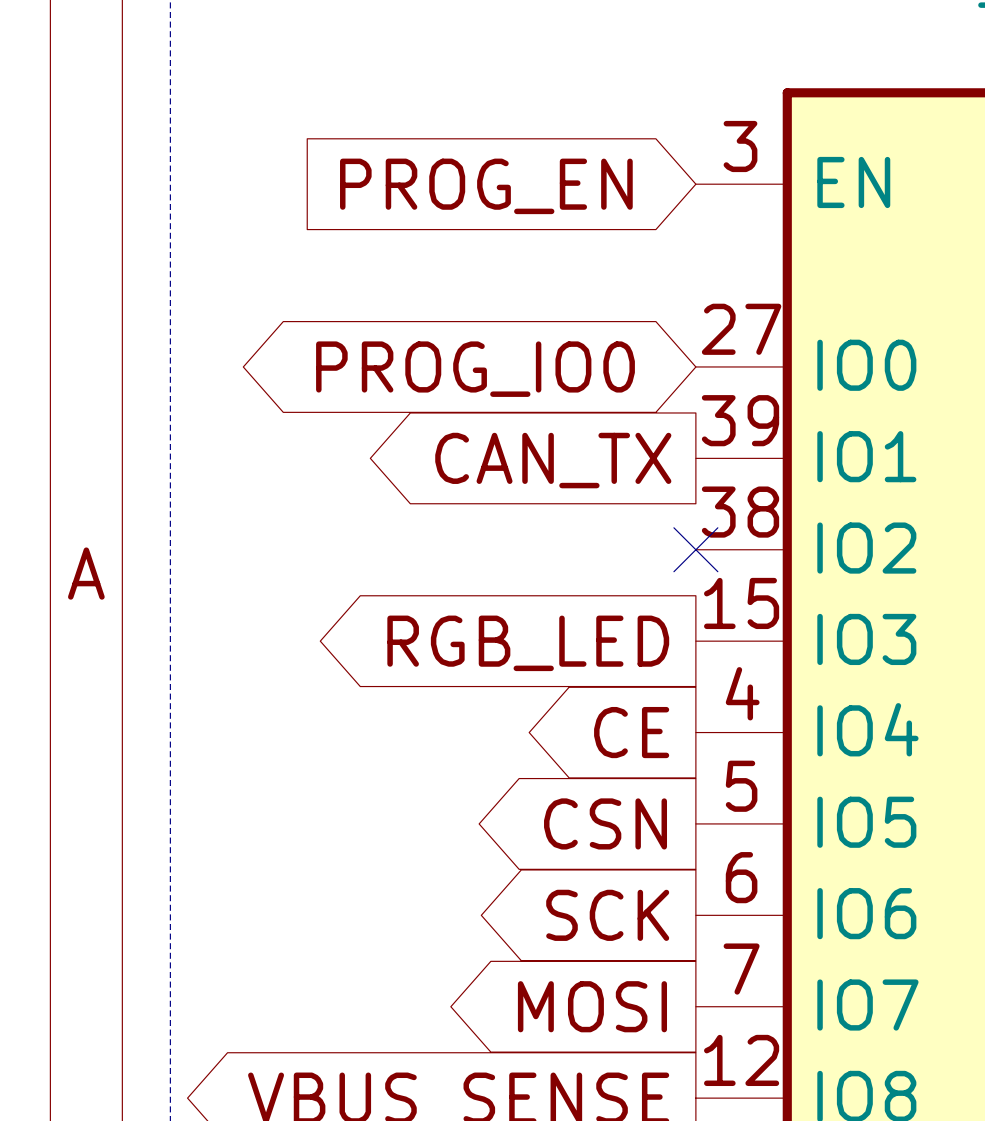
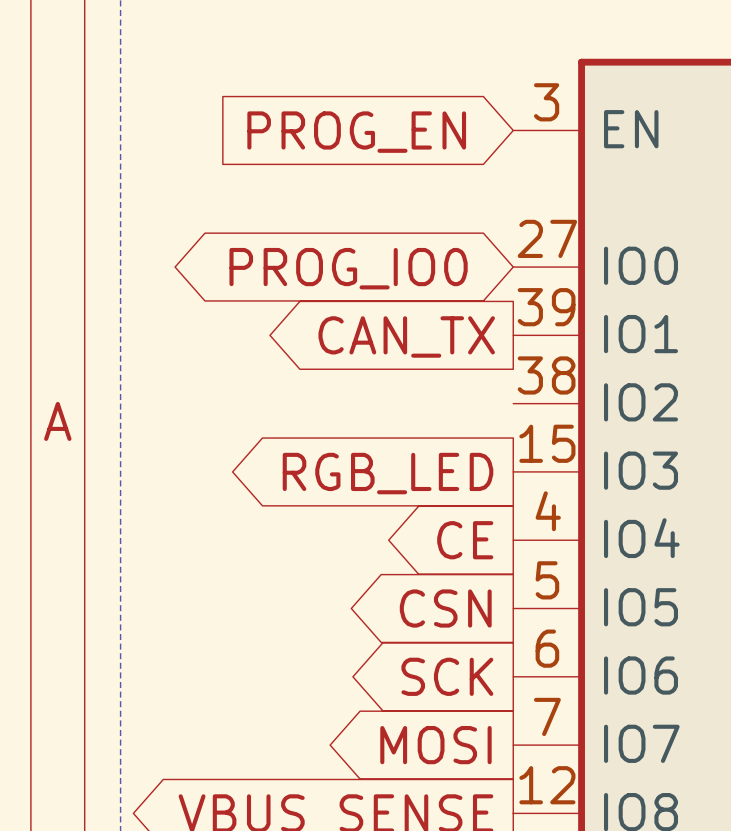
no-connect mark: (695, 549) -> none

